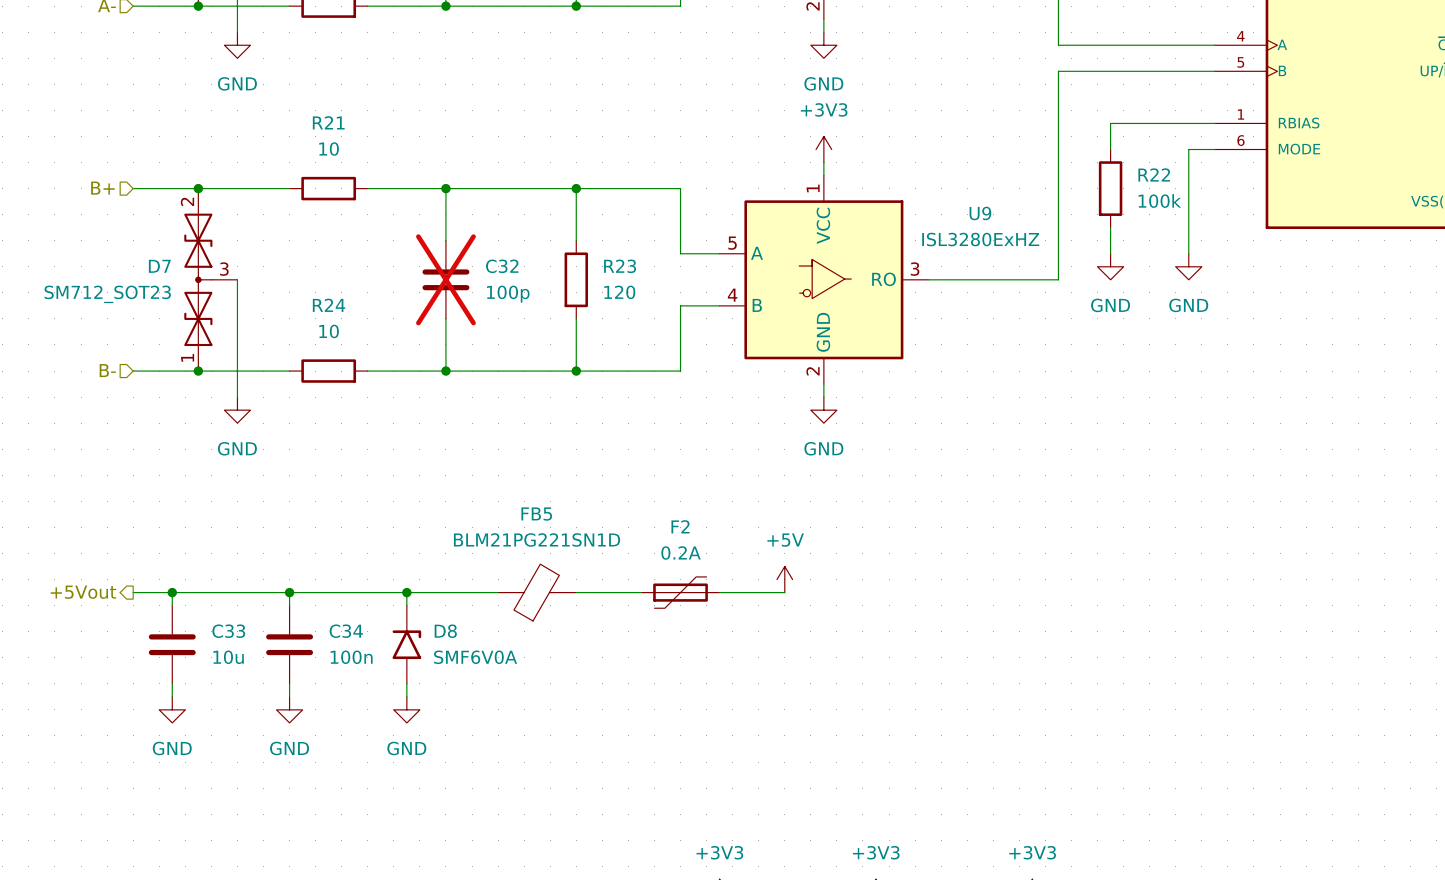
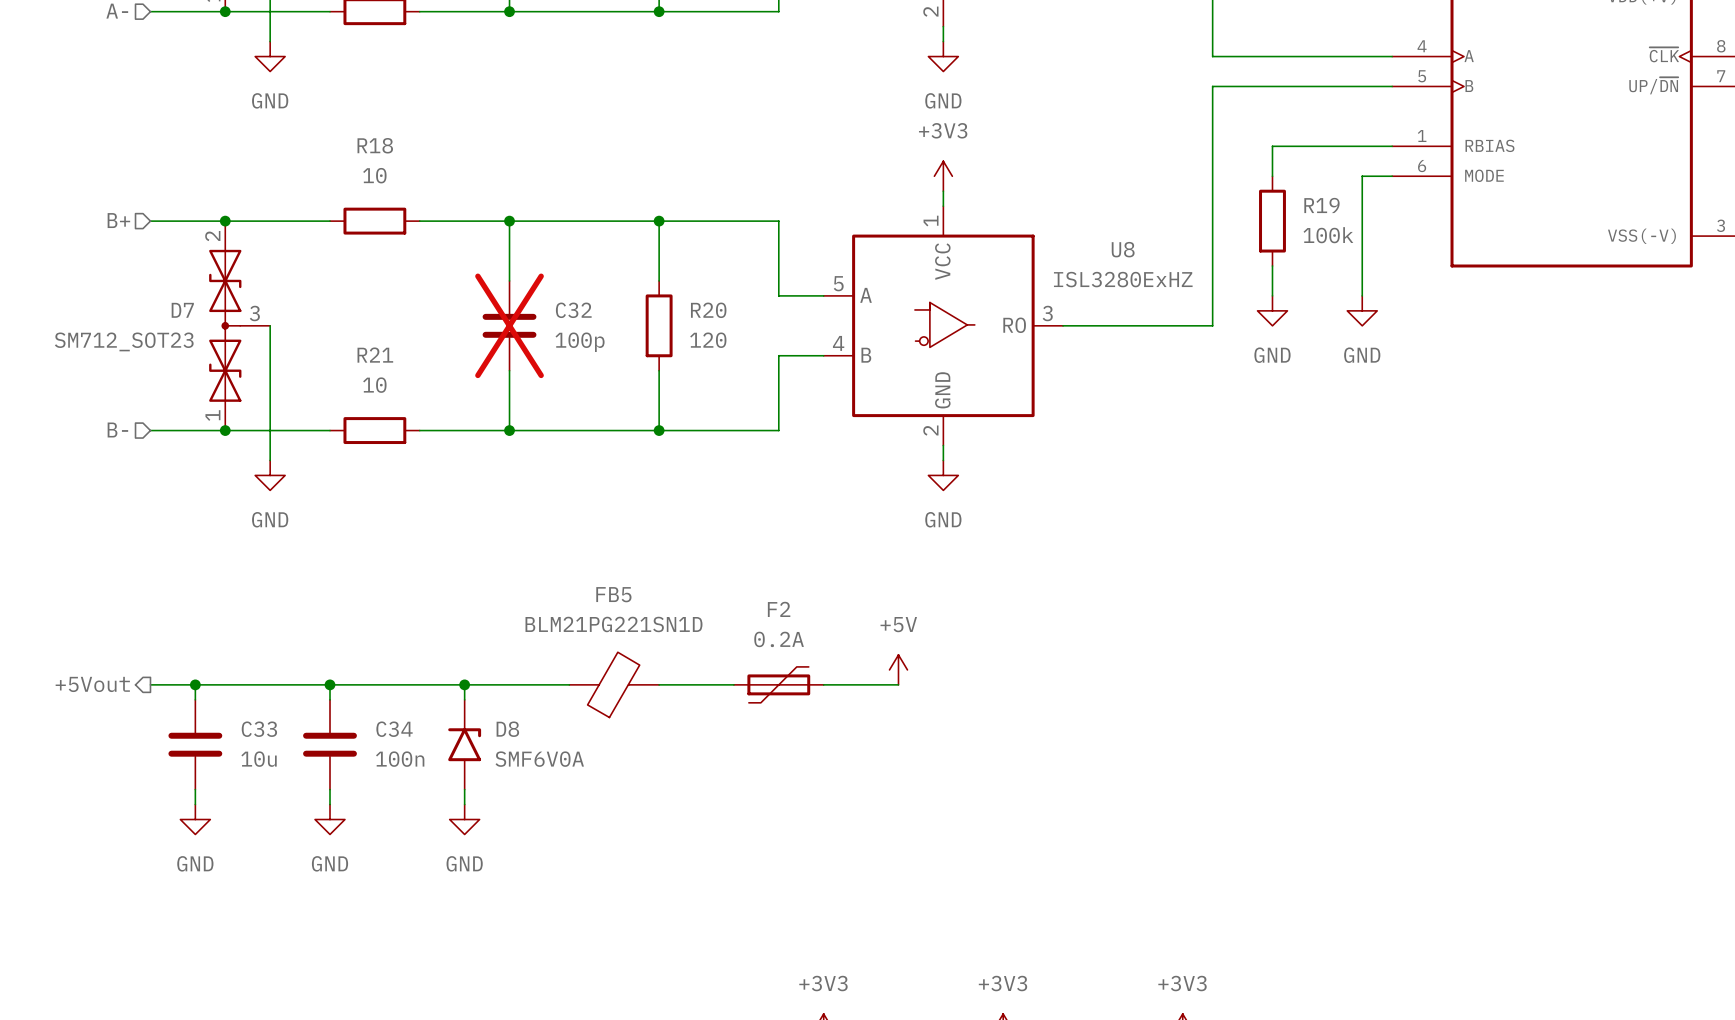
R21 name: R21 (328, 122) -> R18 (375, 145)
R22 name: R22 (1154, 174) -> R19 (1321, 205)
U9 name: U9 (980, 213) -> U8 (1123, 249)
R23 name: R23 (620, 266) -> R20 (708, 310)
R24 name: R24 (329, 305) -> R21 (375, 355)

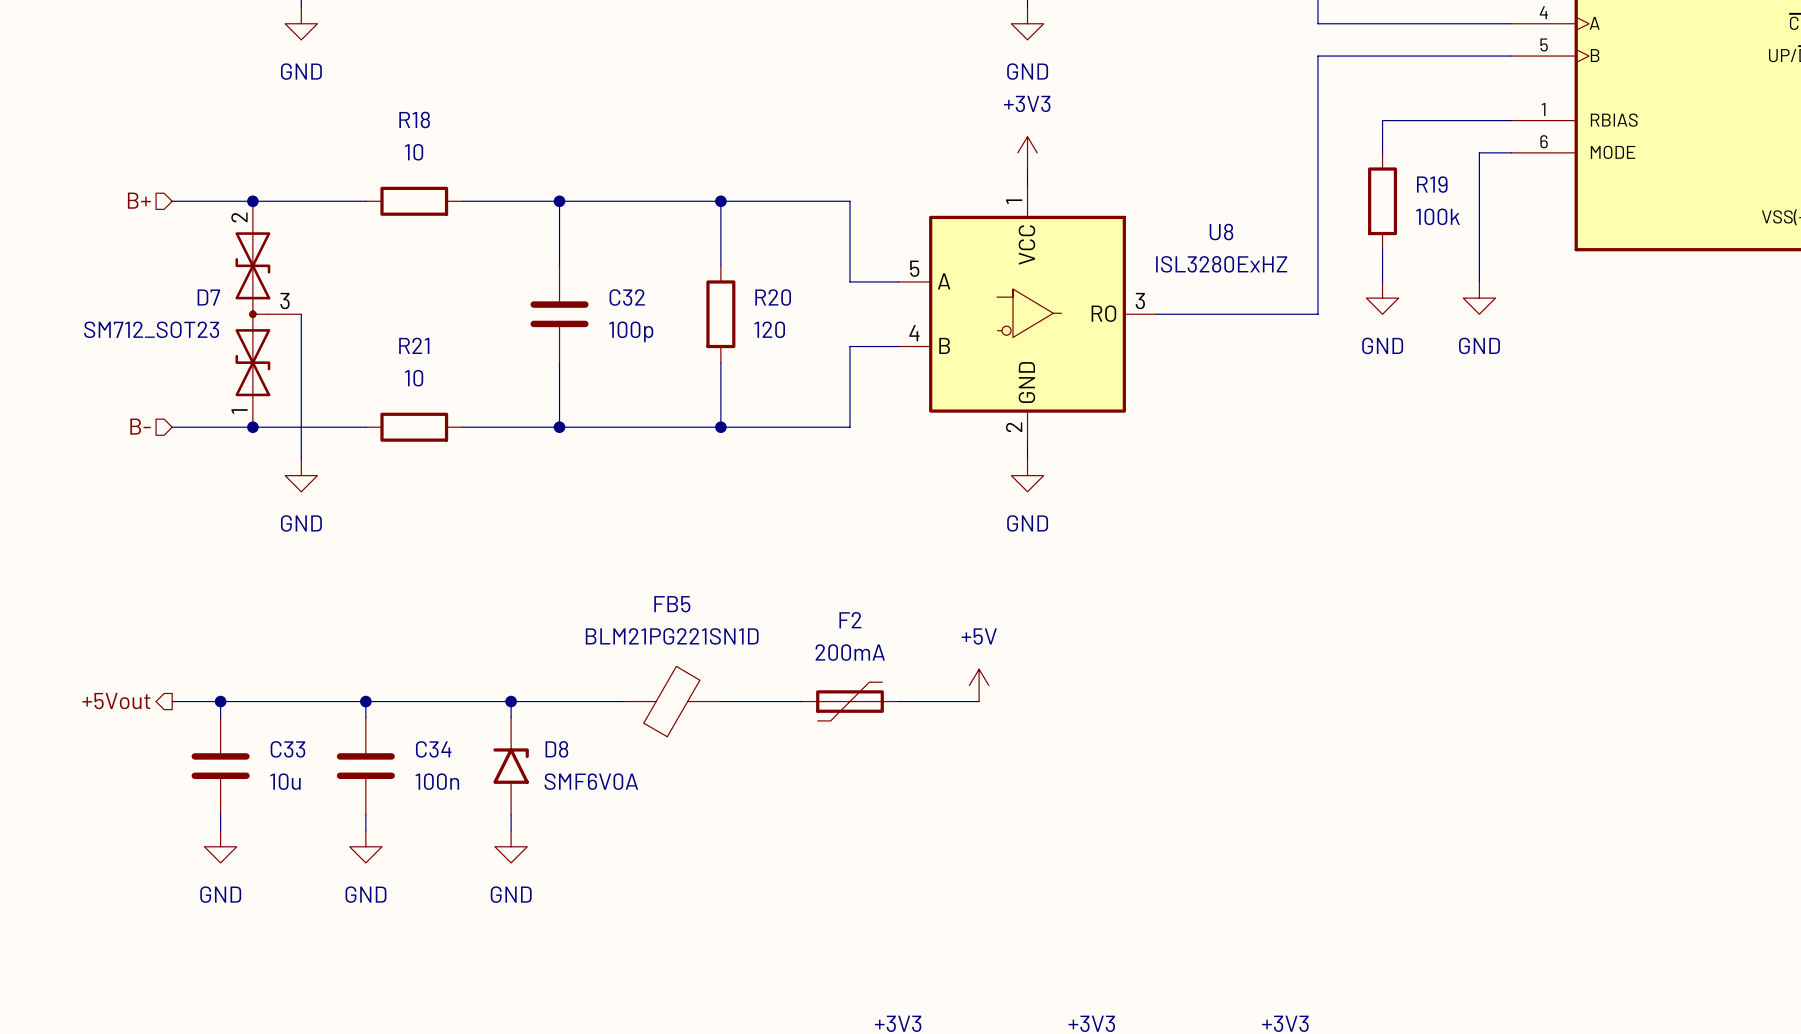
C32 do-not-place cross: (509, 325) -> none
F2 value: 0.2A (779, 639) -> 200mA (850, 652)

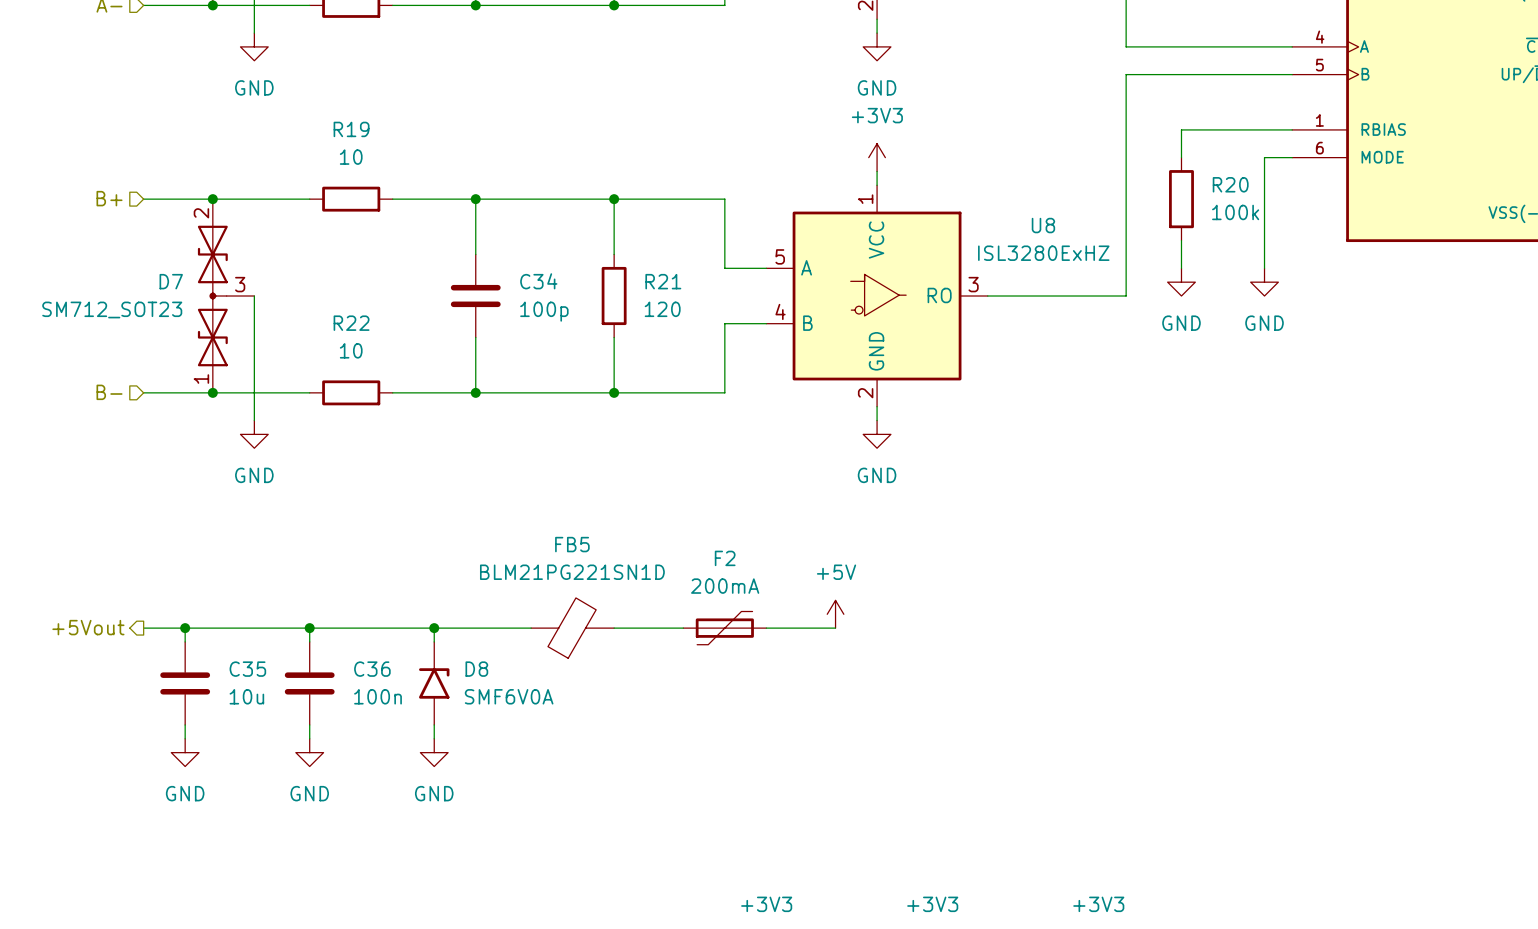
R18 name: R18 (414, 119) -> R19 (351, 129)
R19 name: R19 (1432, 184) -> R20 (1230, 184)
C32 name: C32 (627, 297) -> C34 (538, 281)
R20 name: R20 (773, 297) -> R21 (663, 281)
R21 name: R21 (414, 345) -> R22 (351, 323)
C33 name: C33 (287, 749) -> C35 (247, 669)
C34 name: C34 (433, 749) -> C36 (372, 669)

